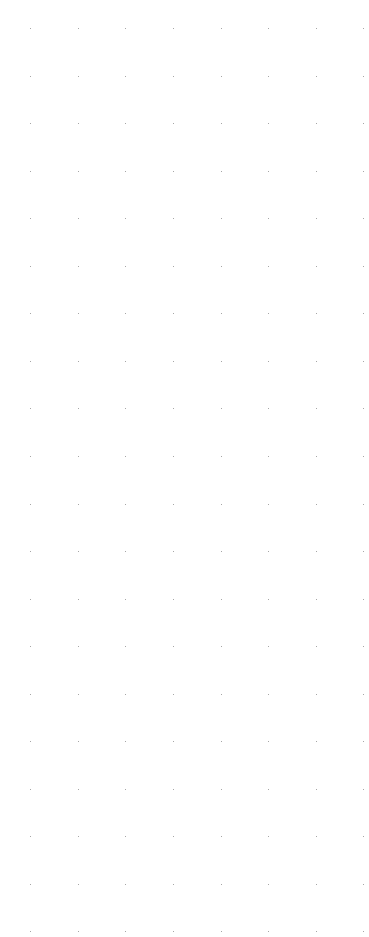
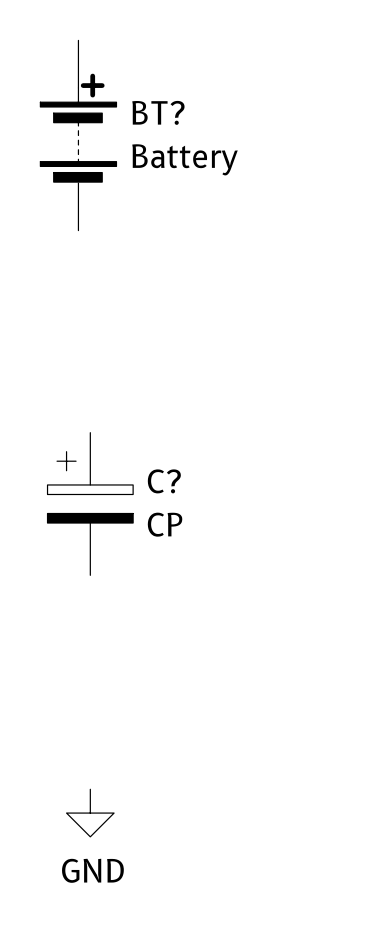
BT?: none -> Battery (78, 135)
C?: none -> CP (90, 504)
power symbol: none -> GND (90, 813)

